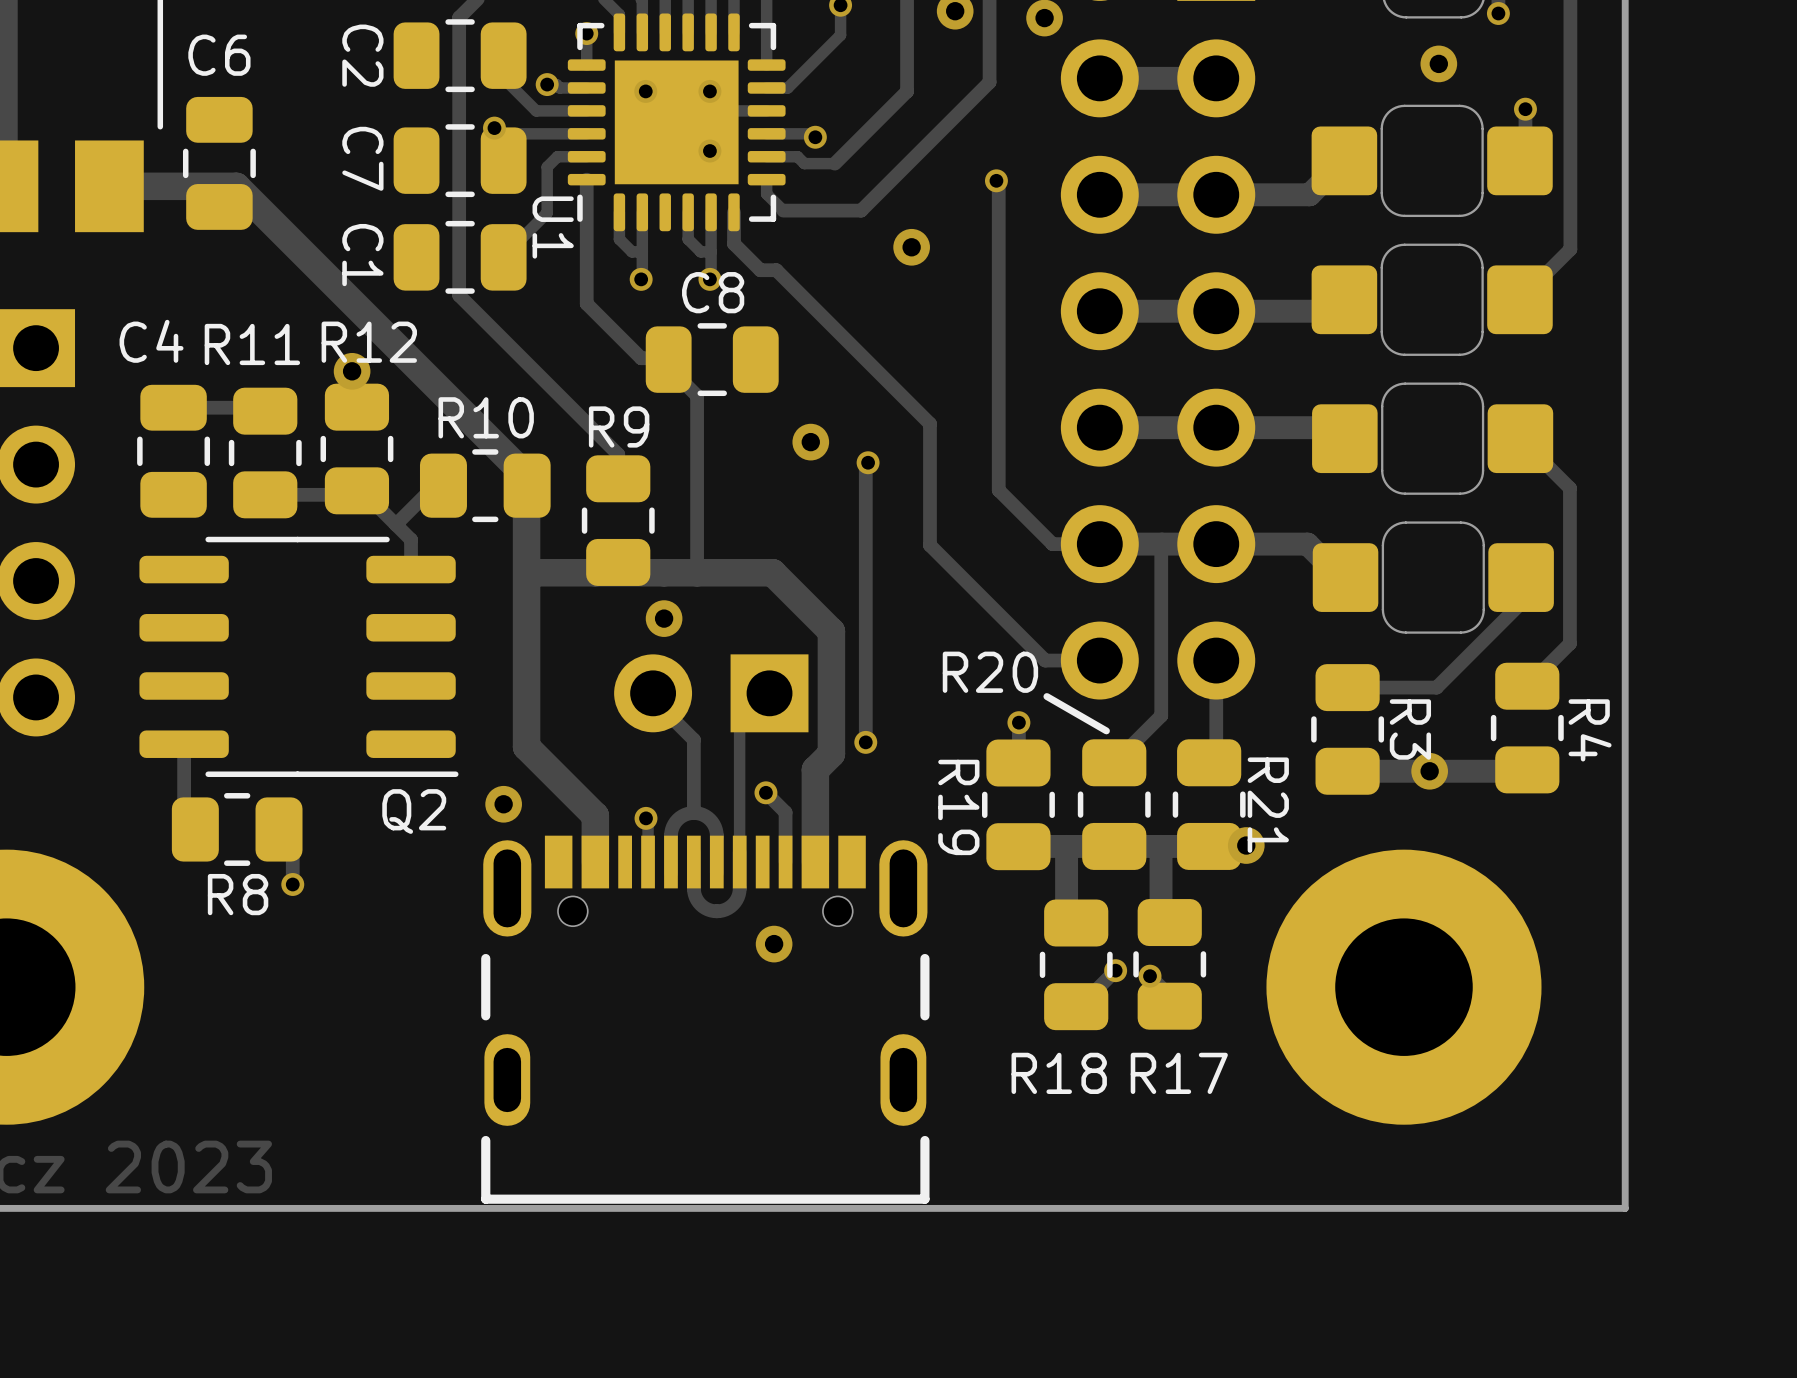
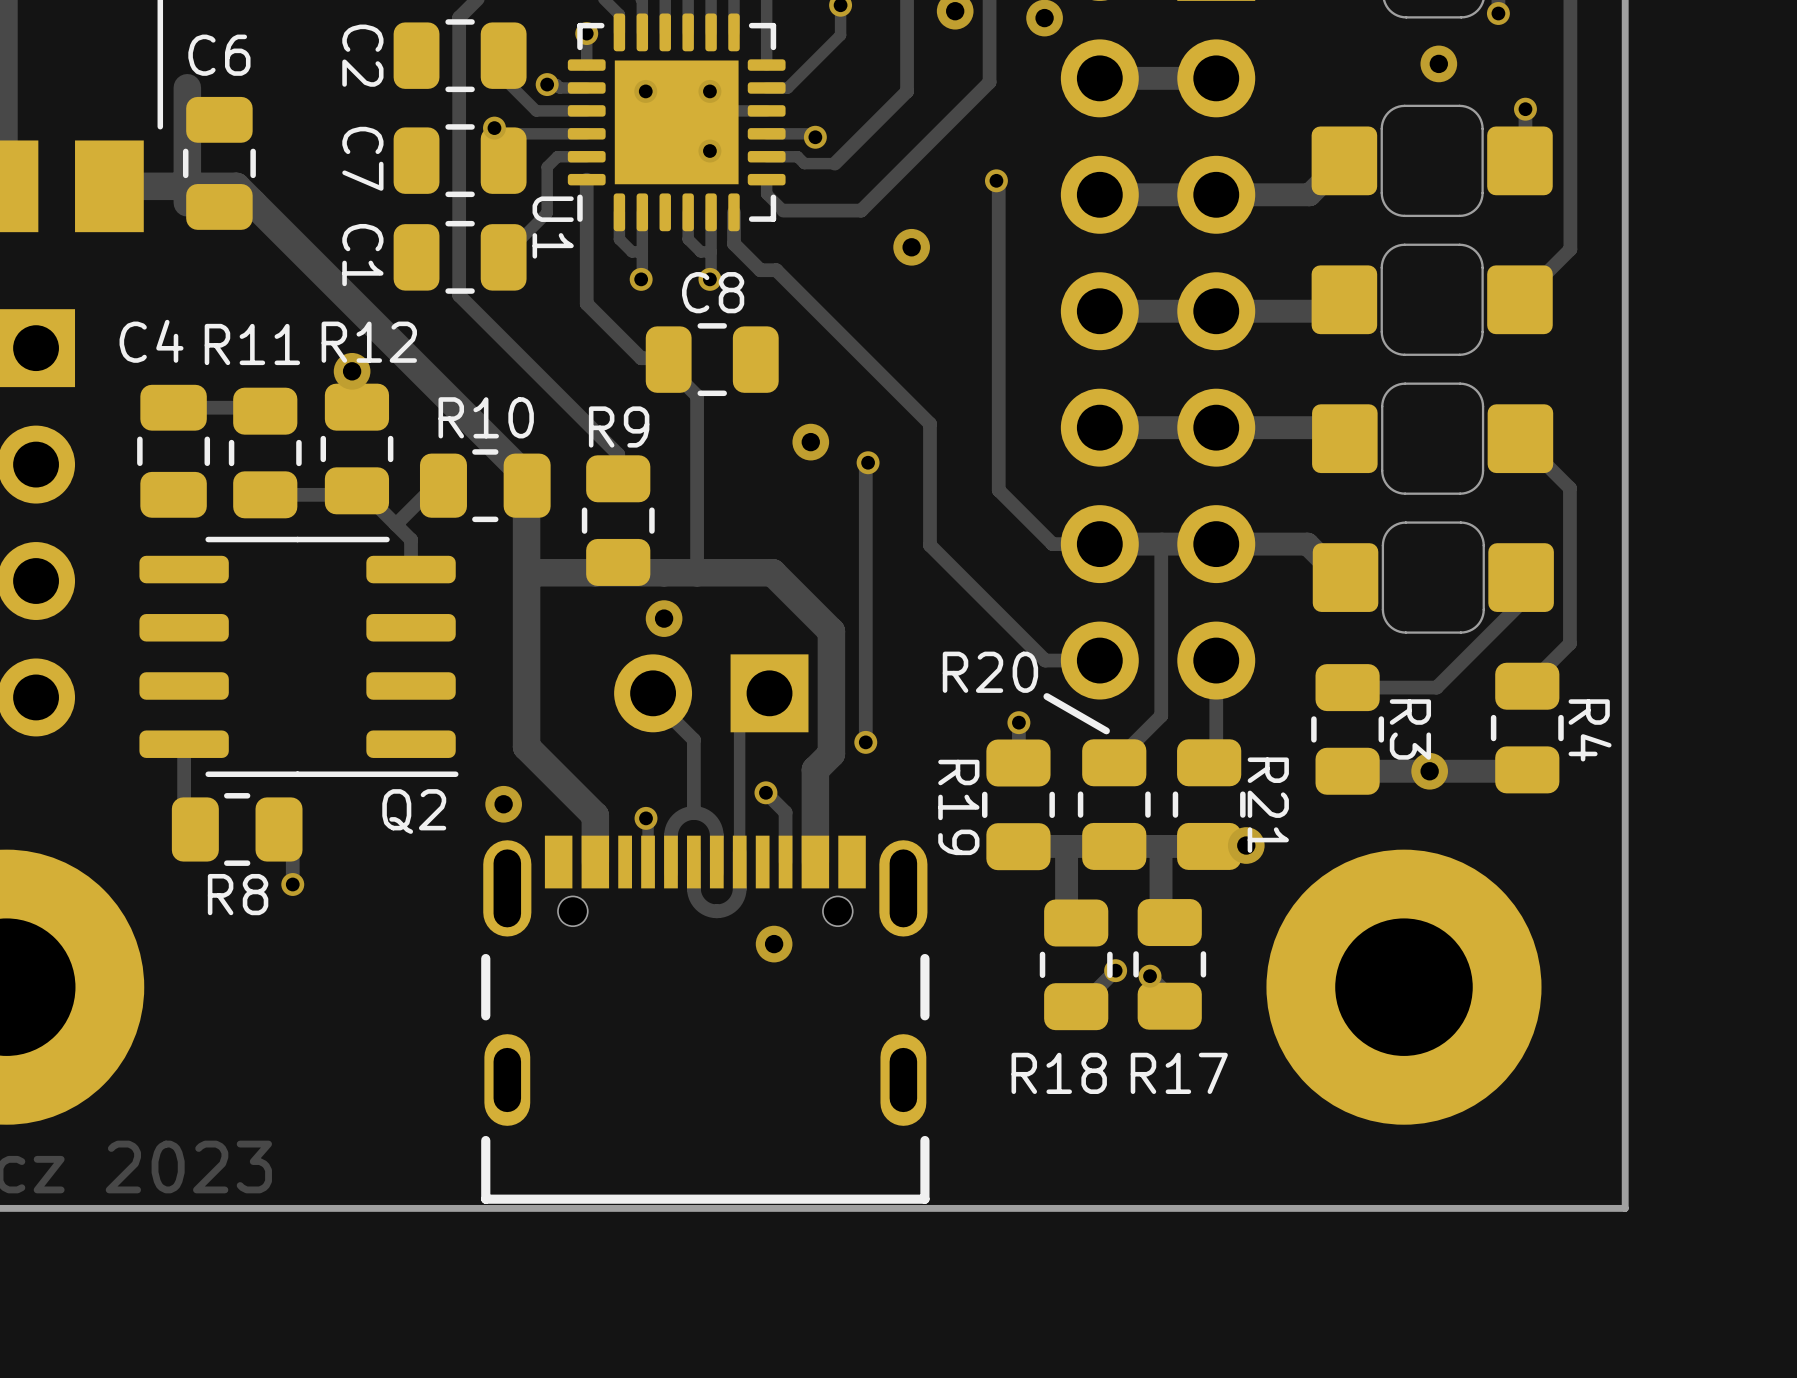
track: none -> (187, 87) (187, 202)

